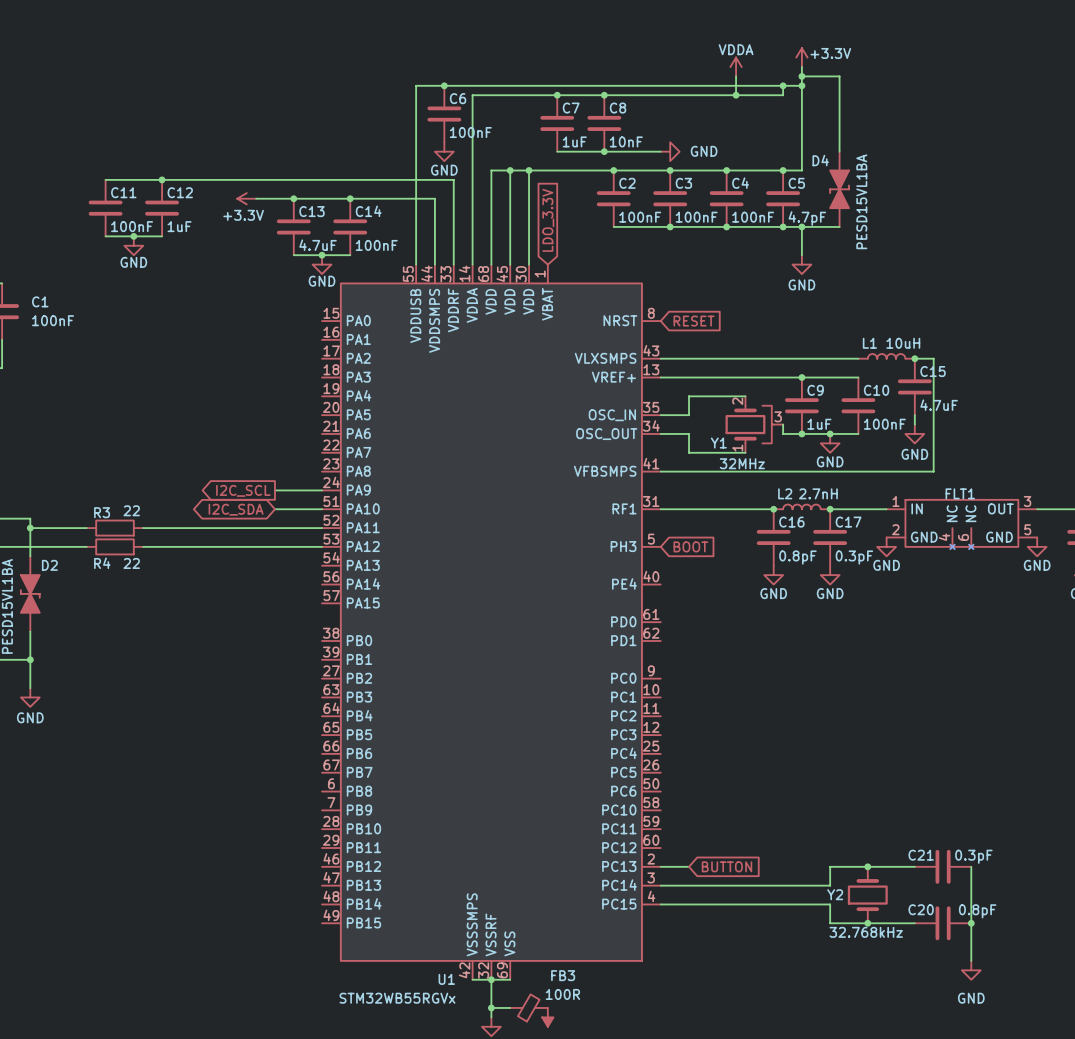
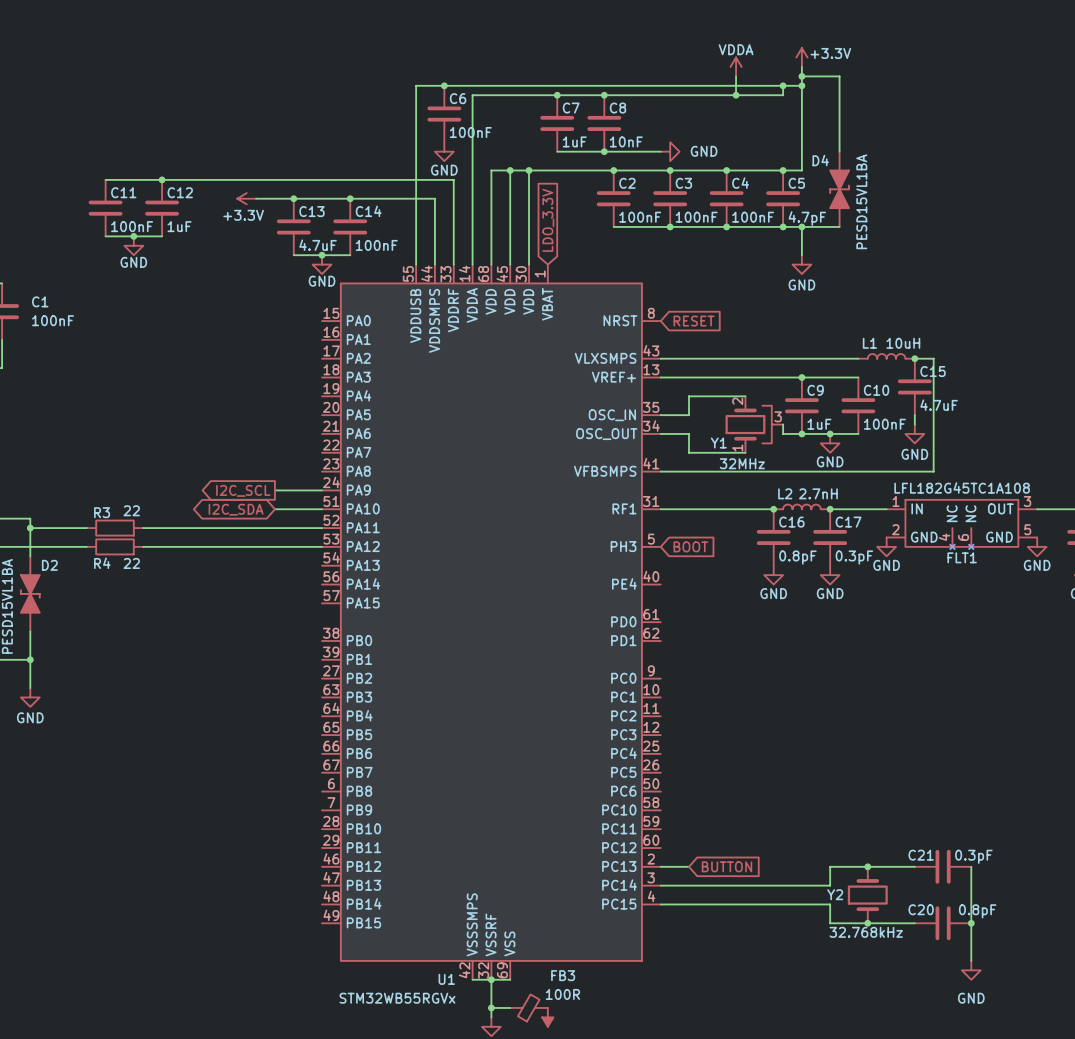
FLT1 text: none -> LFL182G45TC1A108 (962, 487)
FLT1 name position: FLT1 (960, 493) -> FLT1 (962, 557)

